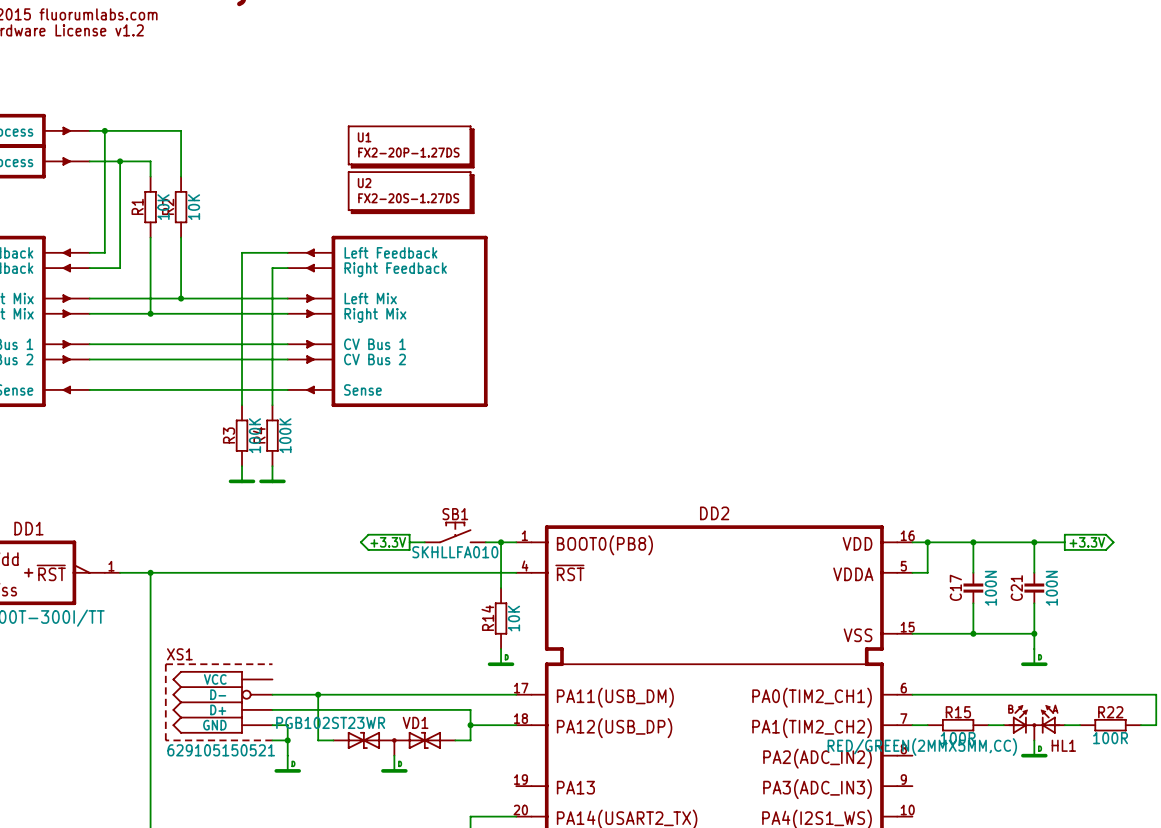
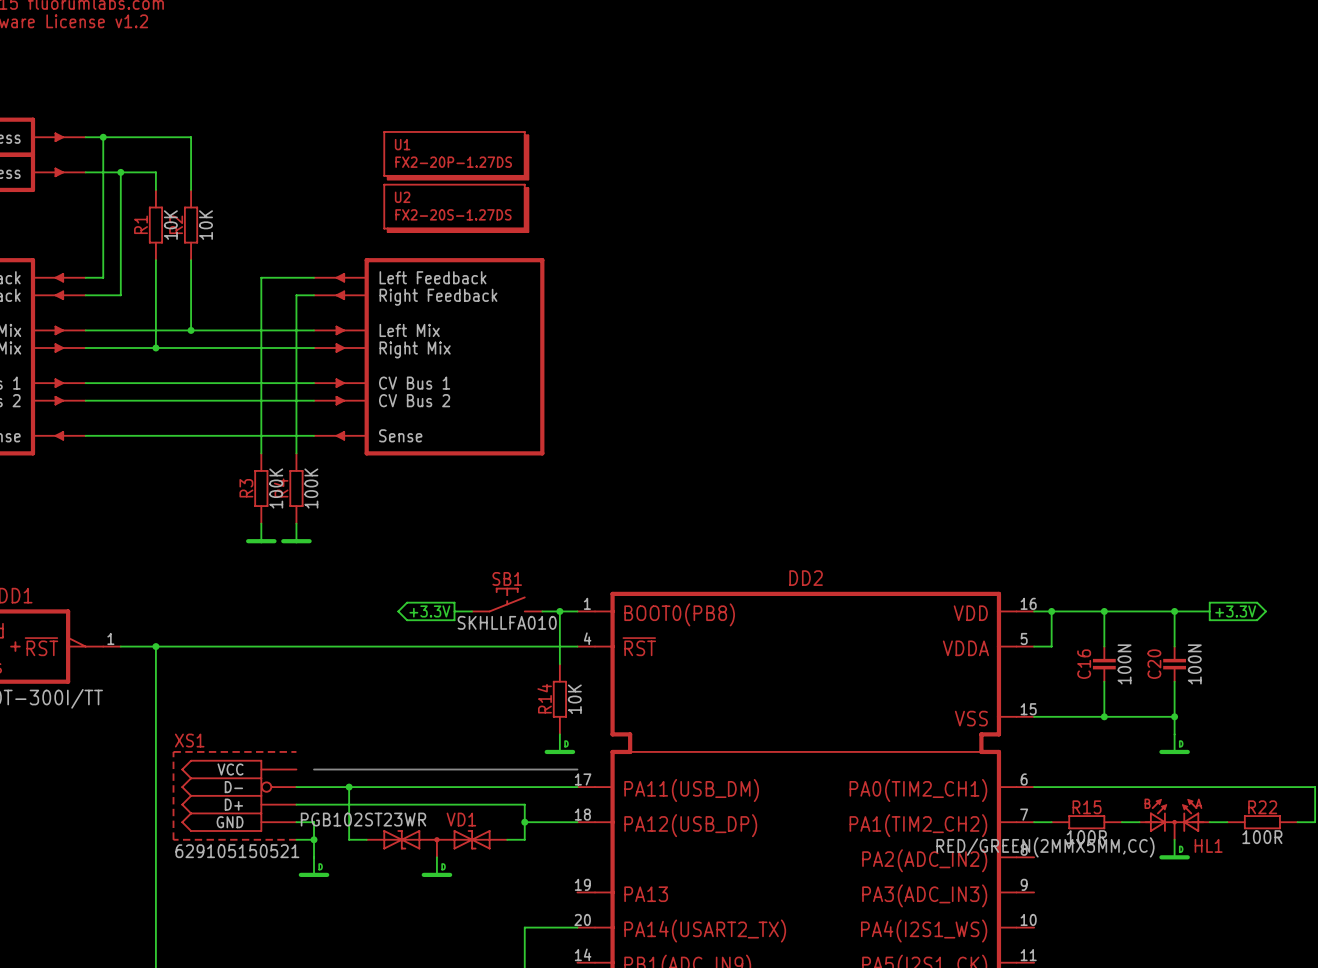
C17 name: C17 (955, 587) -> C16 (1084, 664)
C21 name: C21 (1016, 588) -> C20 (1154, 664)
bus: none -> (314, 769) (577, 769)

